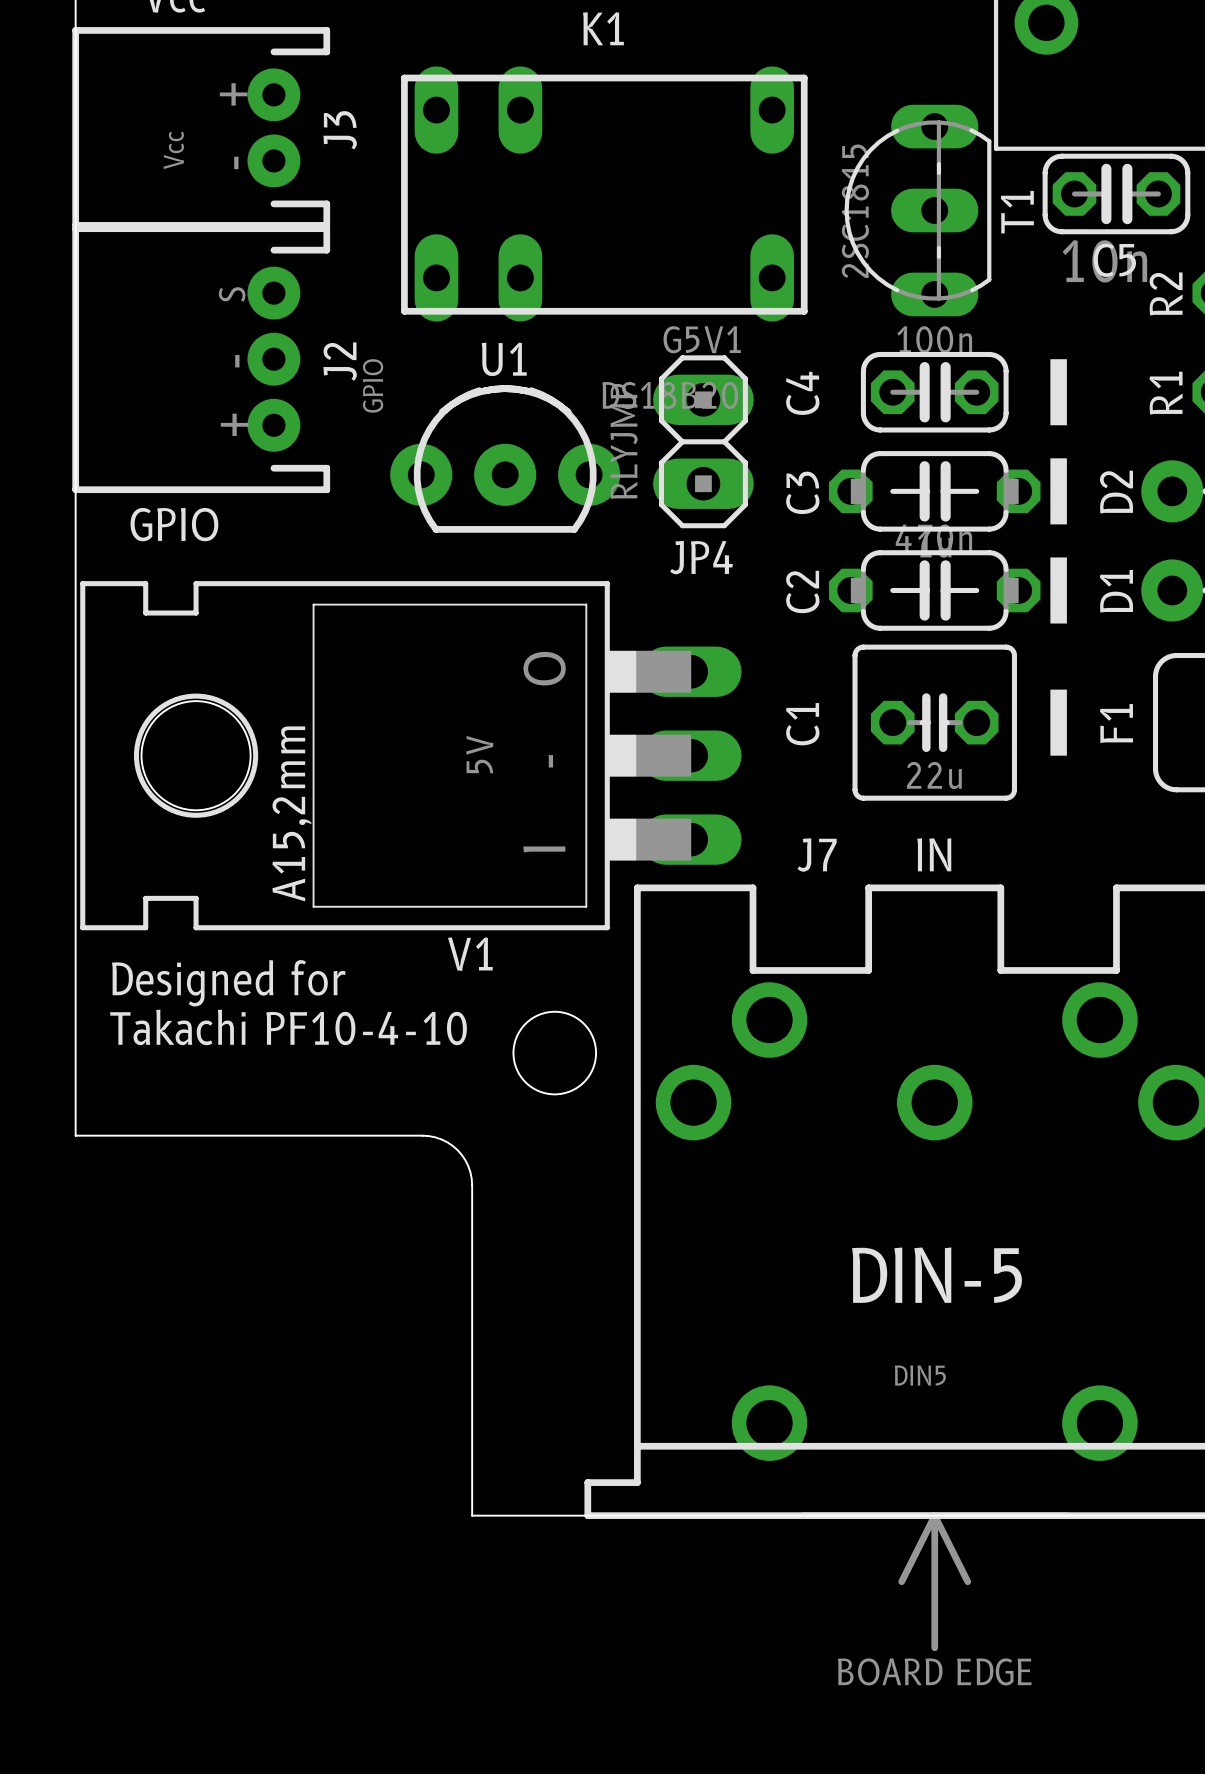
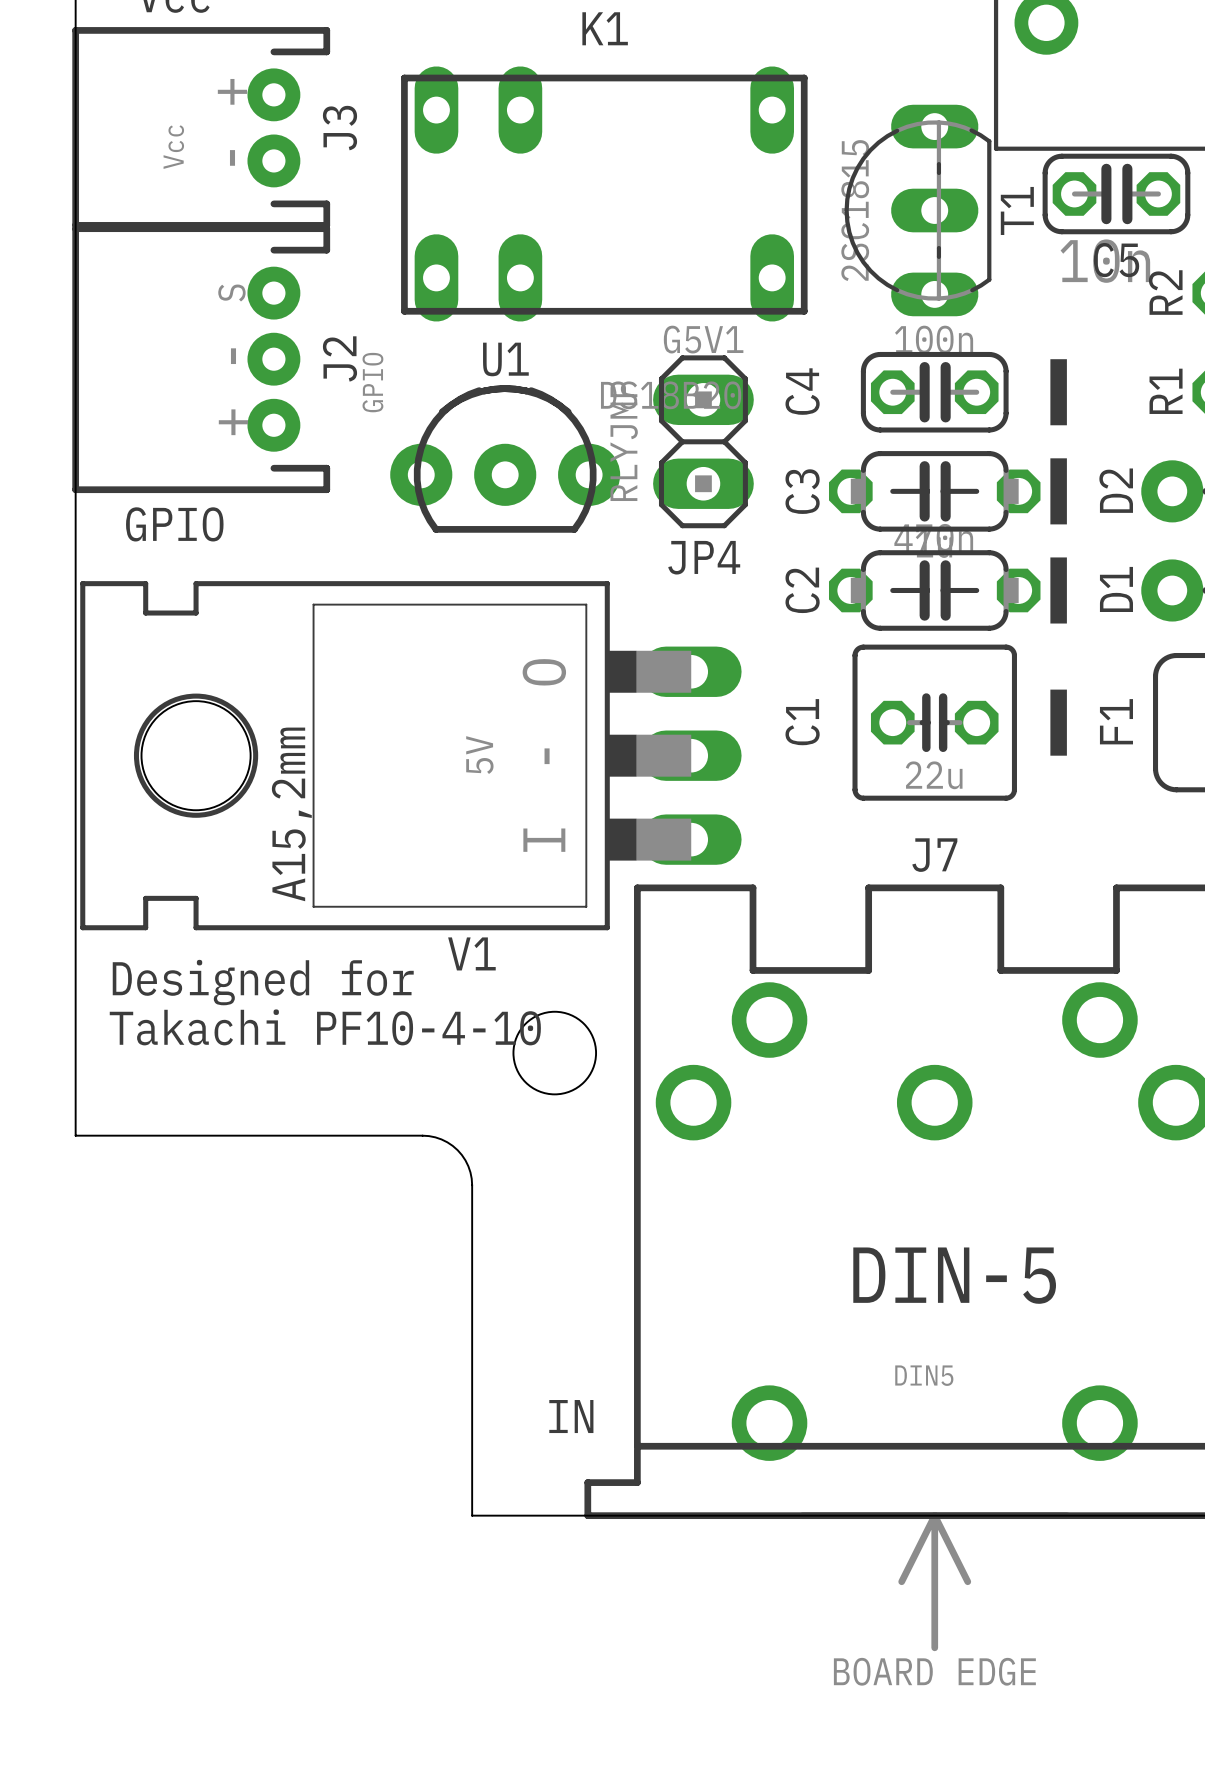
text position: IN (934, 854) -> IN (571, 1416)
J7 name position: J7 (817, 855) -> J7 (934, 855)

